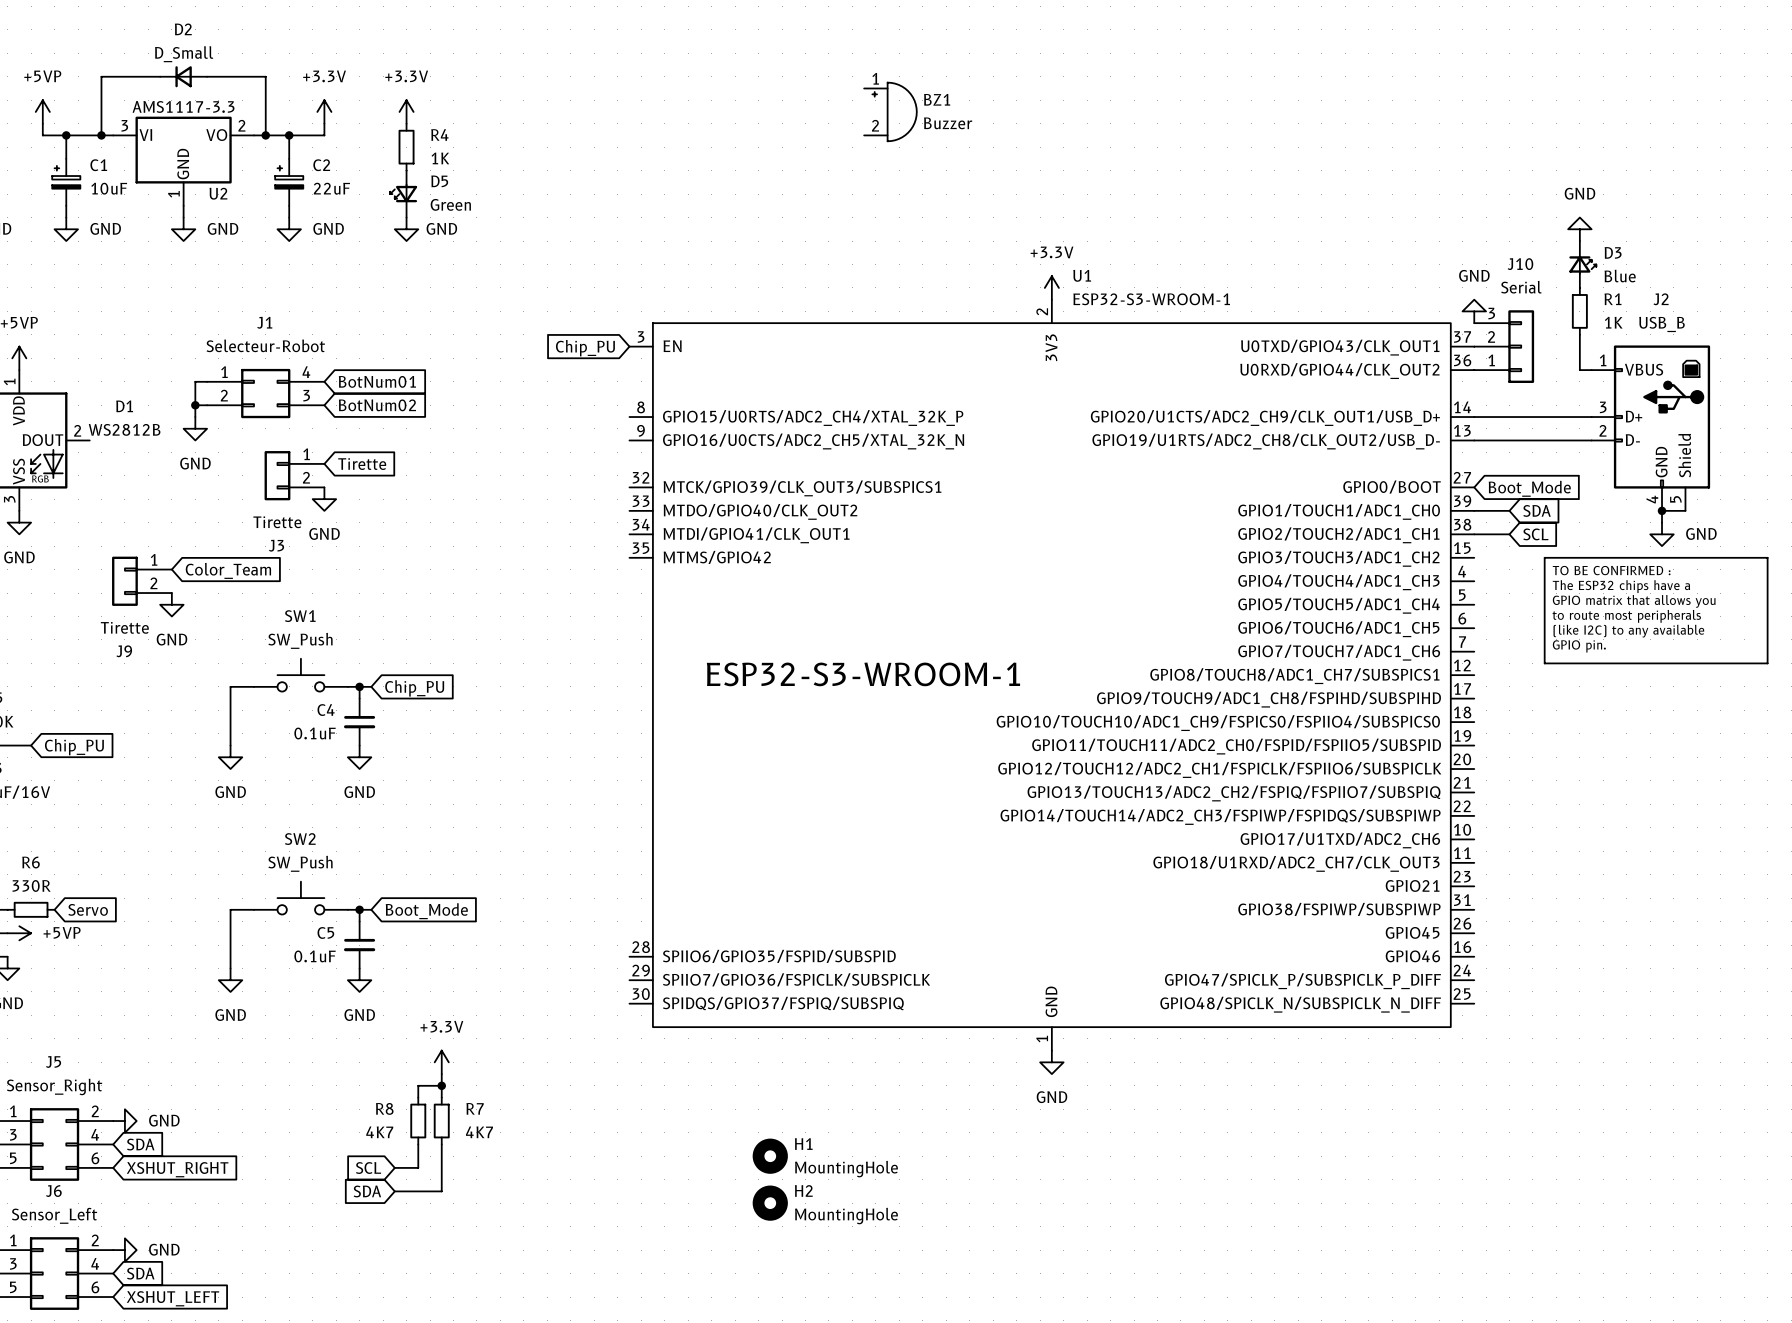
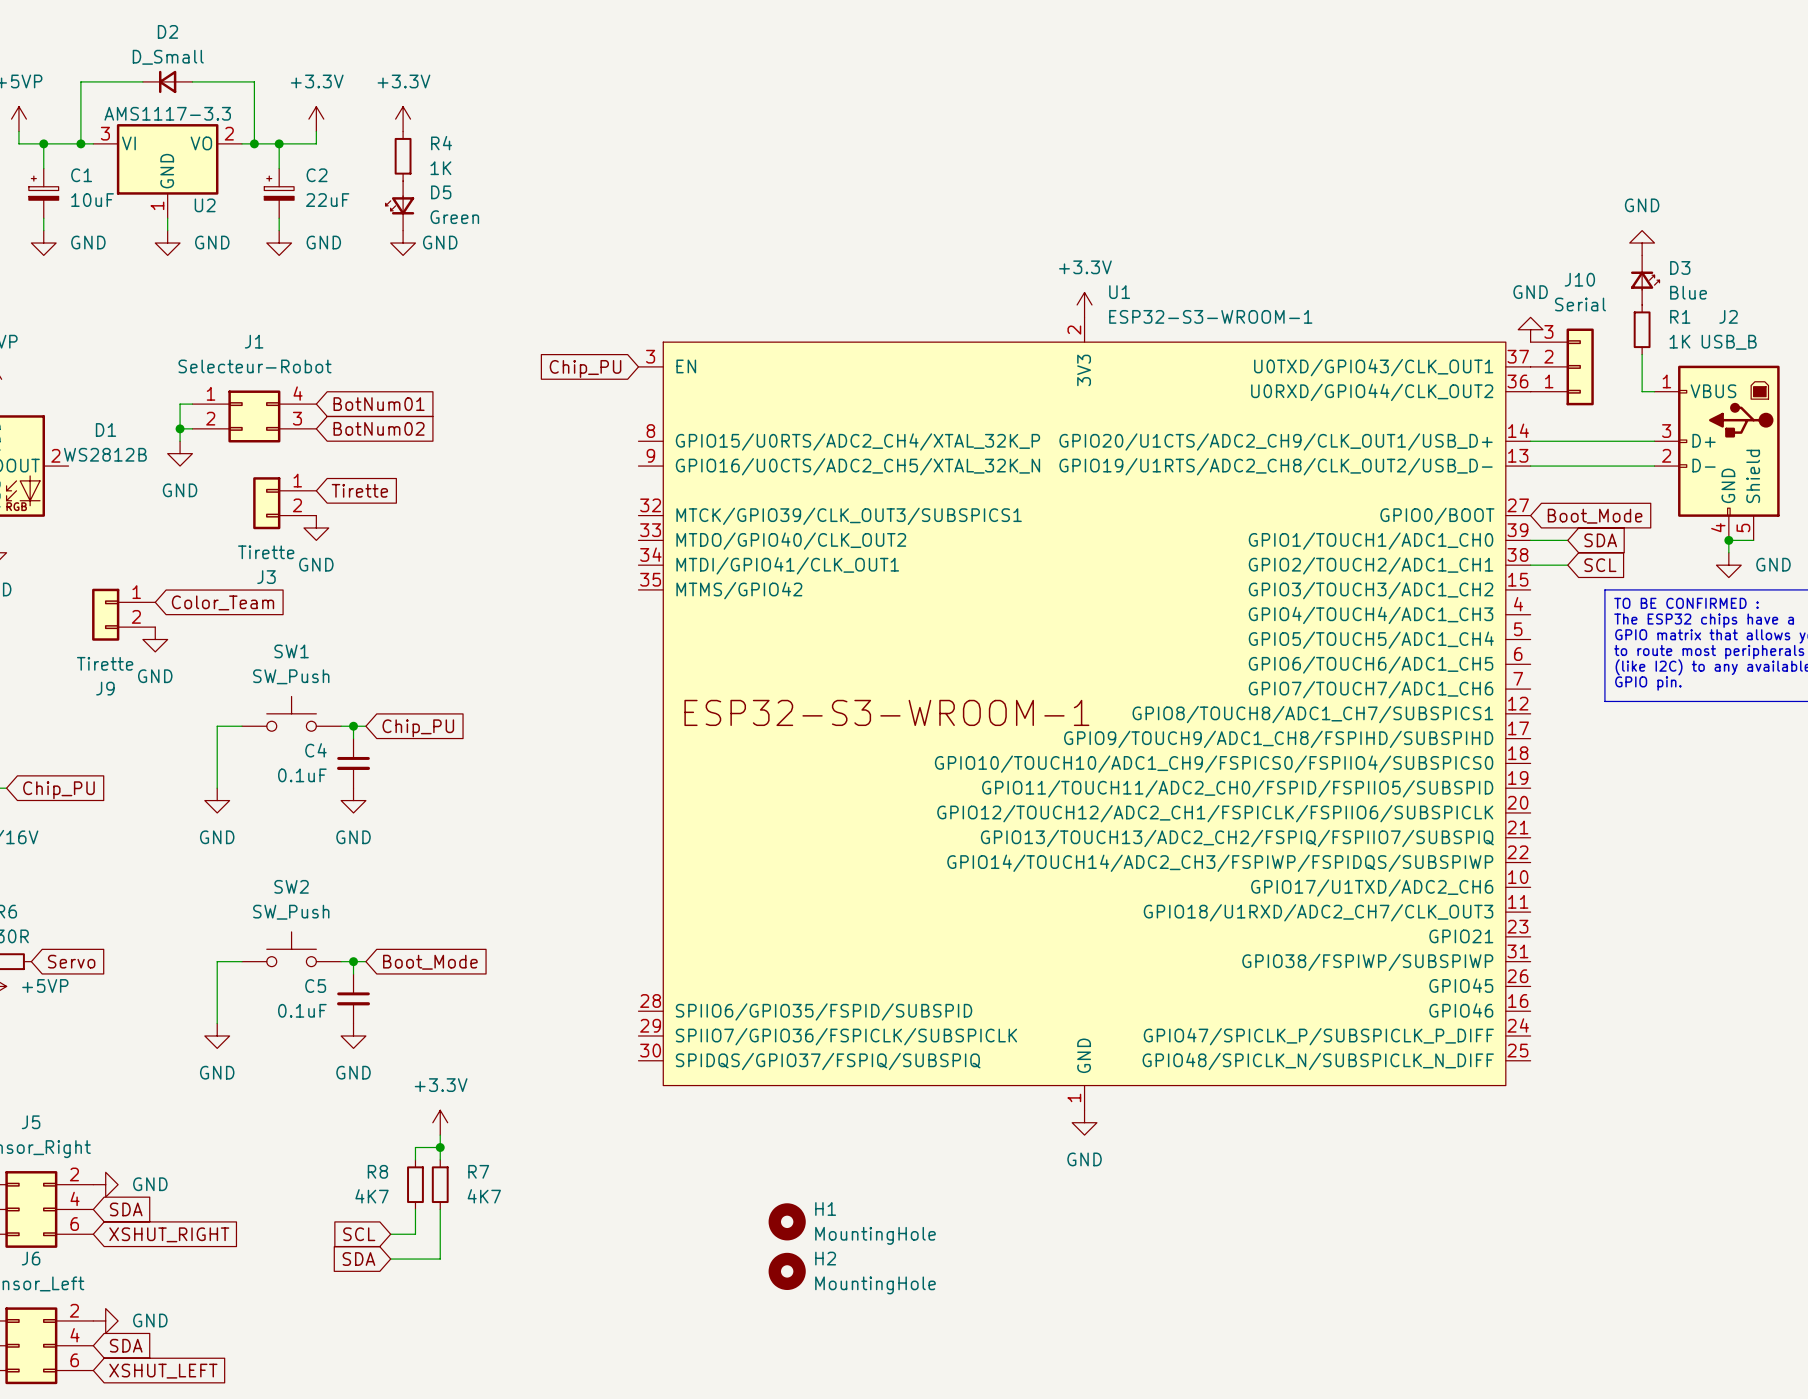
BZ1: Buzzer (890, 111) -> none

